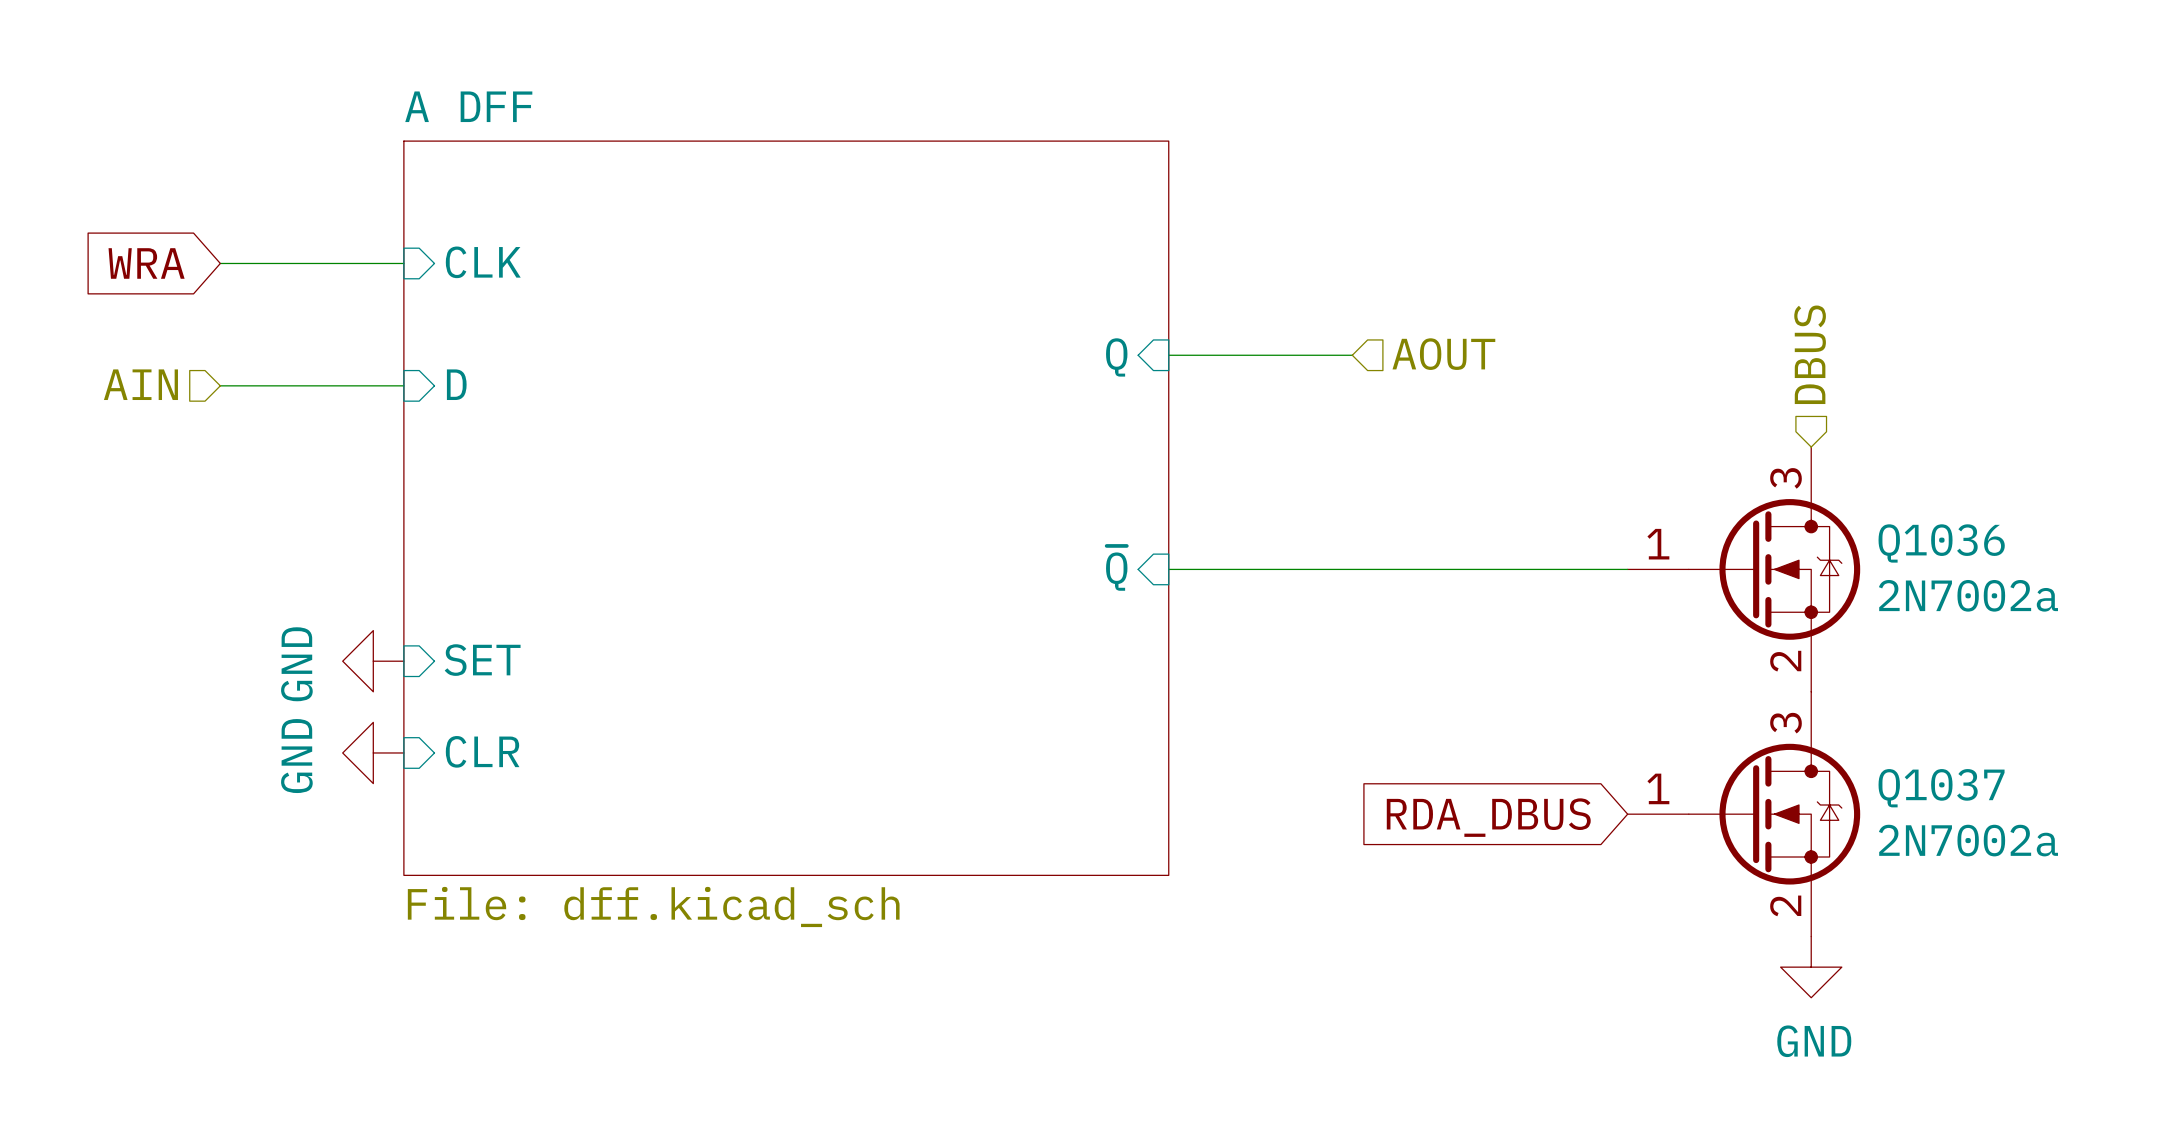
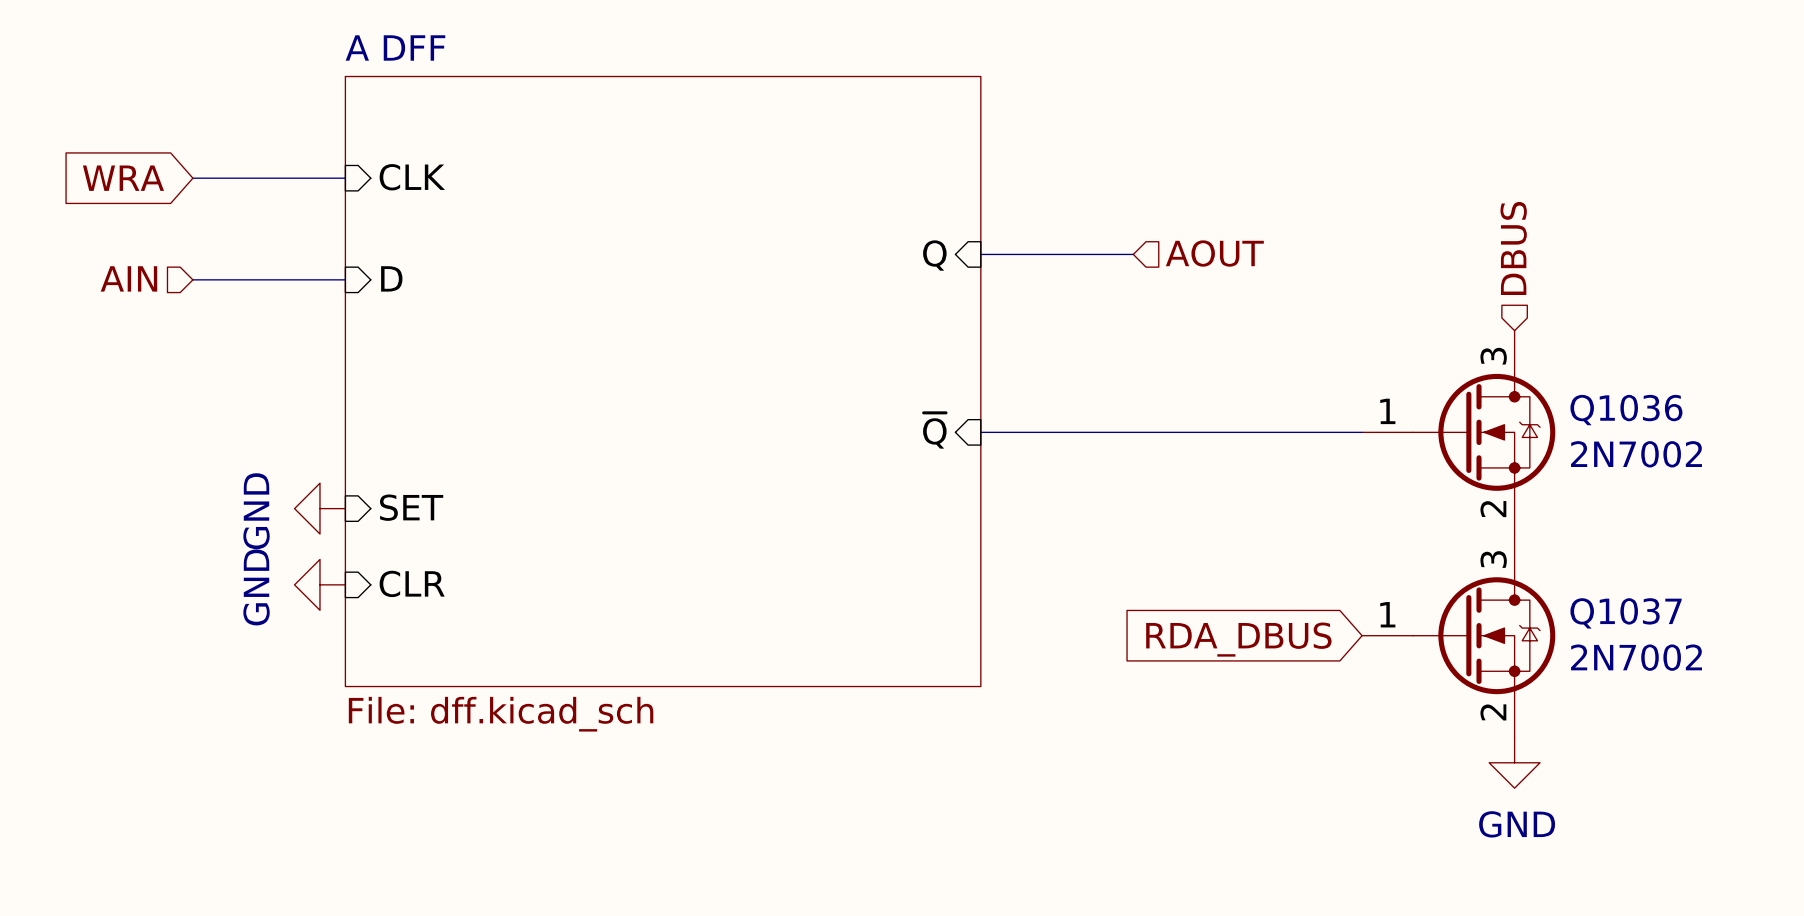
Q1036 value: 2N7002a (1968, 595) -> 2N7002 (1636, 454)
Q1037 value: 2N7002a (1968, 840) -> 2N7002 (1636, 657)

